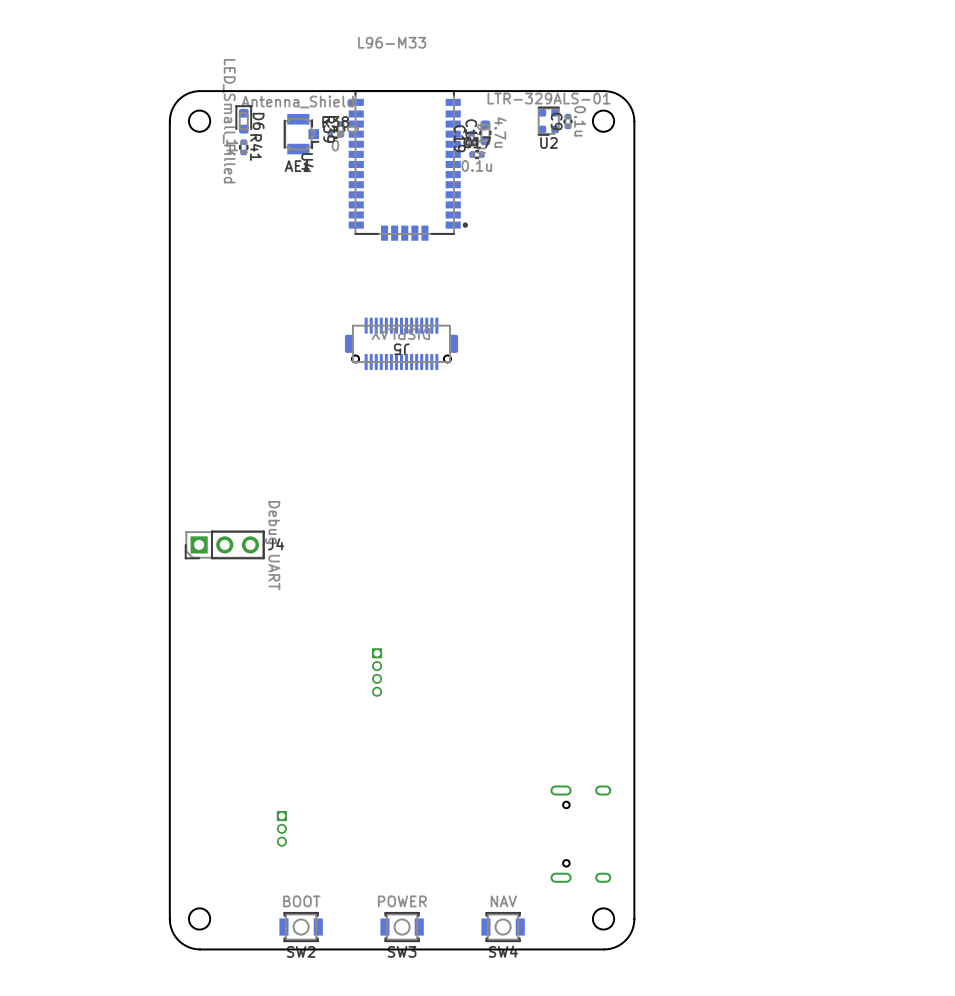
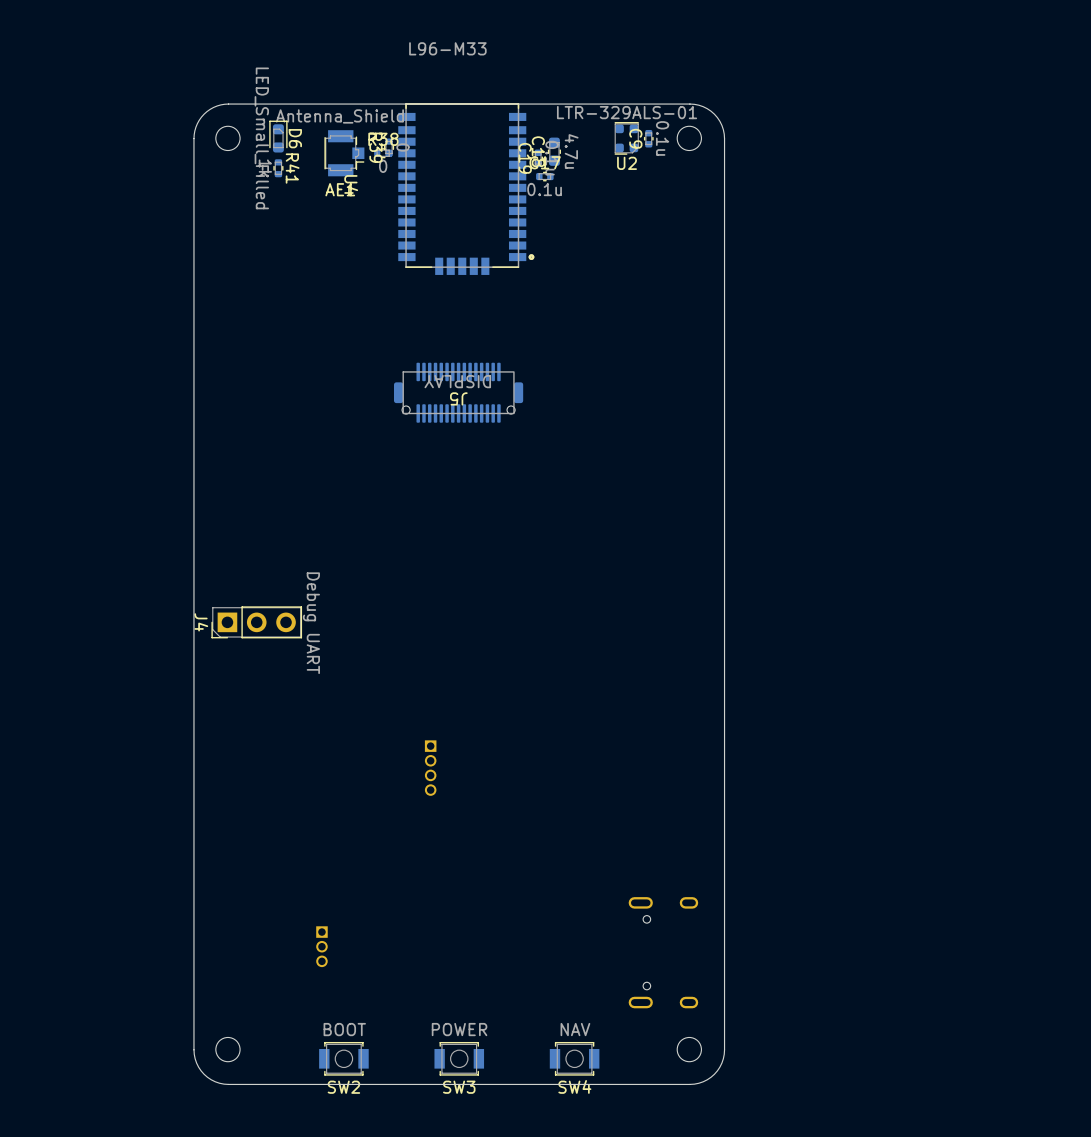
J4 name rotation: 0° (276, 544) -> 90° clockwise (201, 622)
J4 name position: J4 (276, 544) -> J4 (201, 622)

